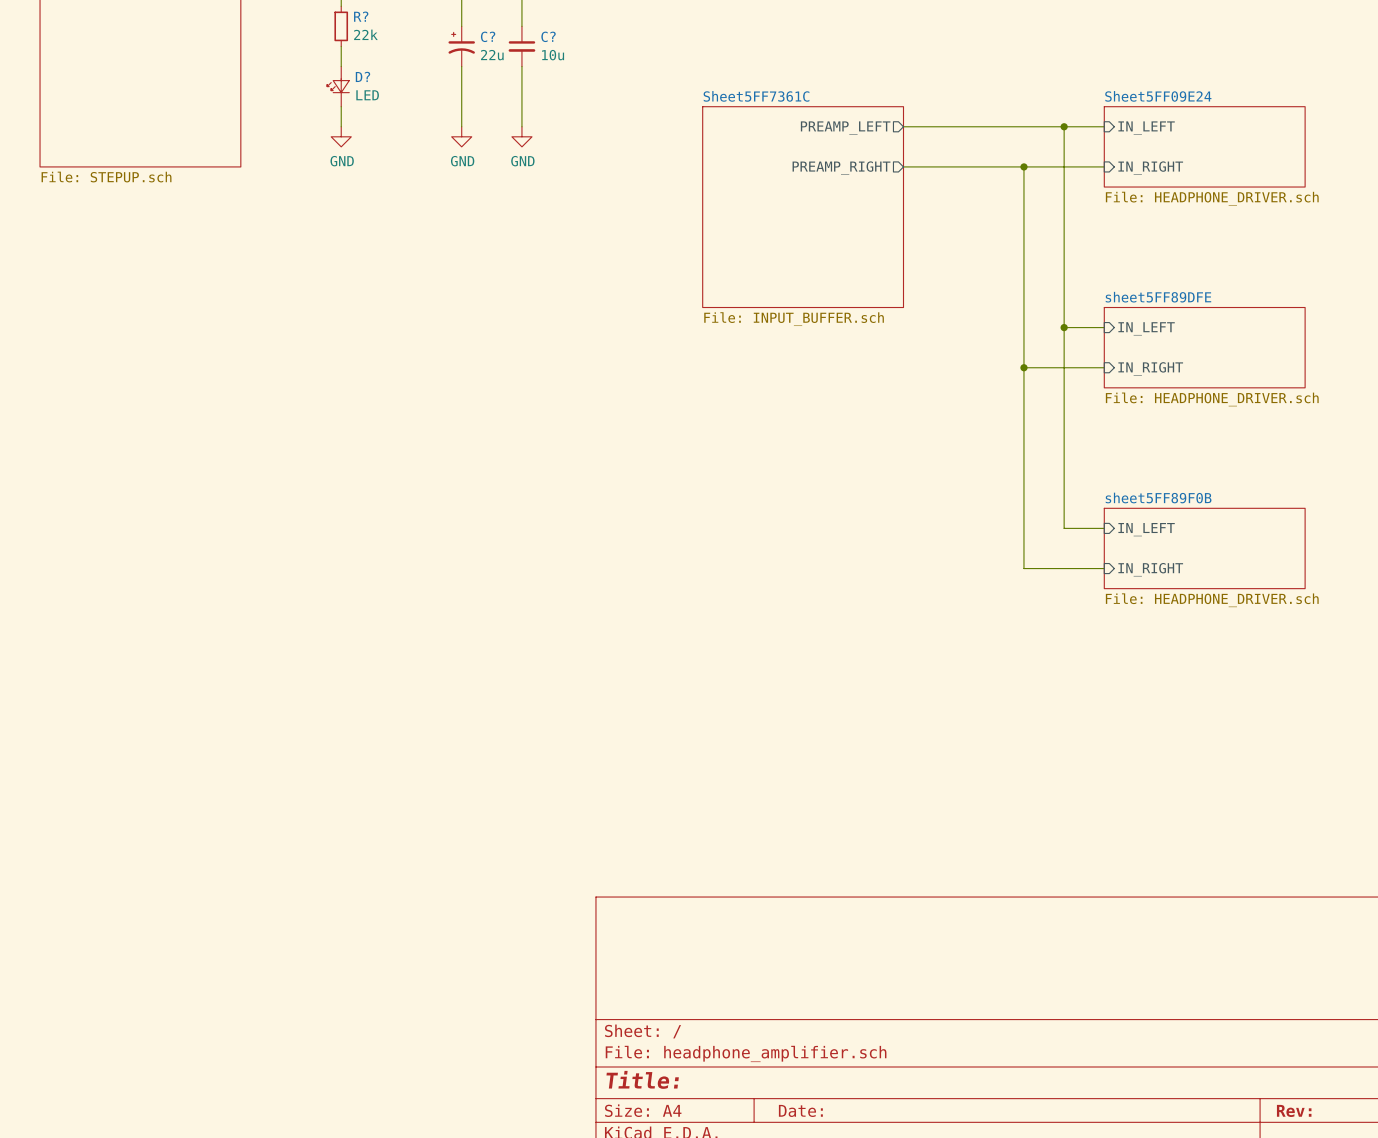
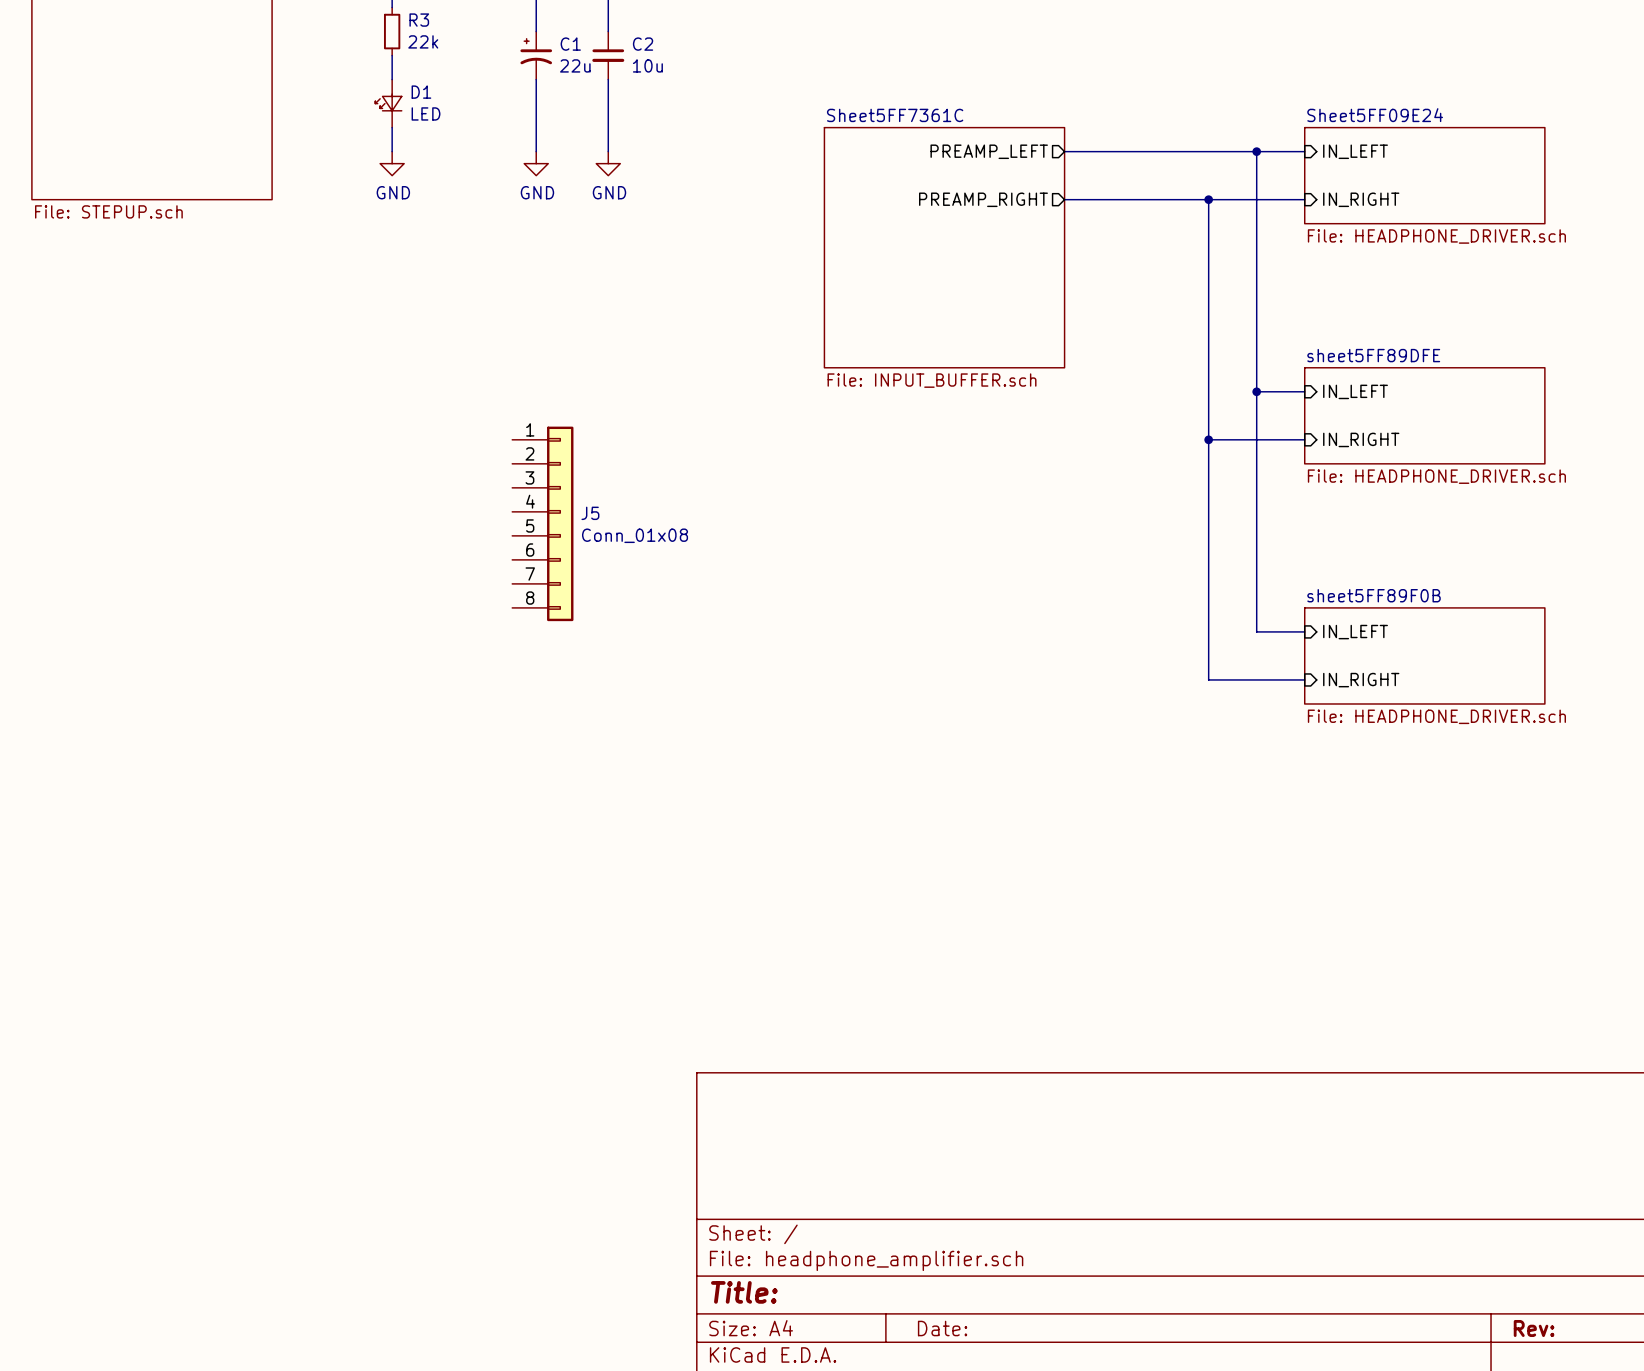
R? name: R? (361, 16) -> R3 (419, 20)
C? name: C? (488, 36) -> C1 (570, 44)
C? name: C? (548, 36) -> C2 (643, 44)
D? name: D? (362, 76) -> D1 (421, 92)
J5: none -> Conn_01x08 (542, 523)

